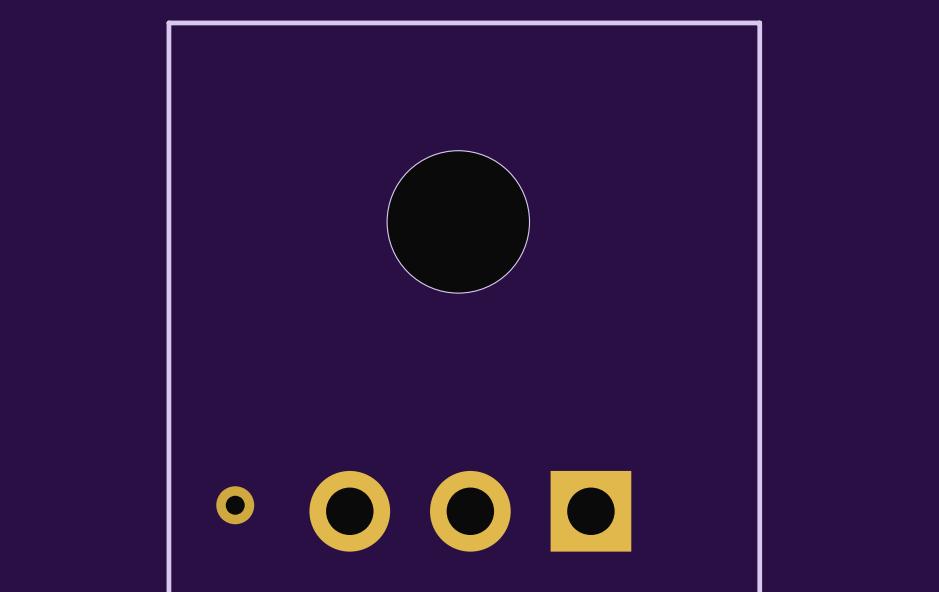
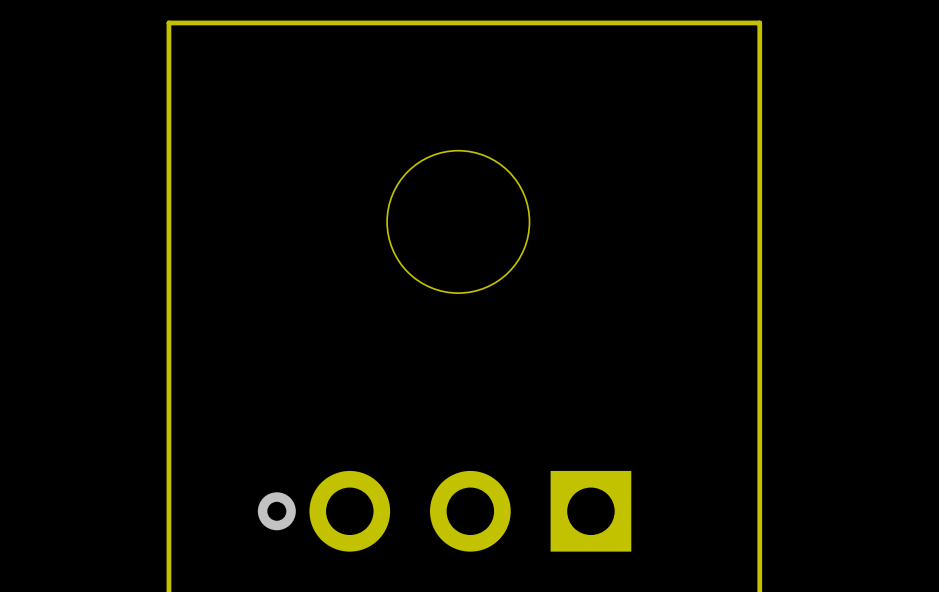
via position: (235, 505) -> (276, 511)

